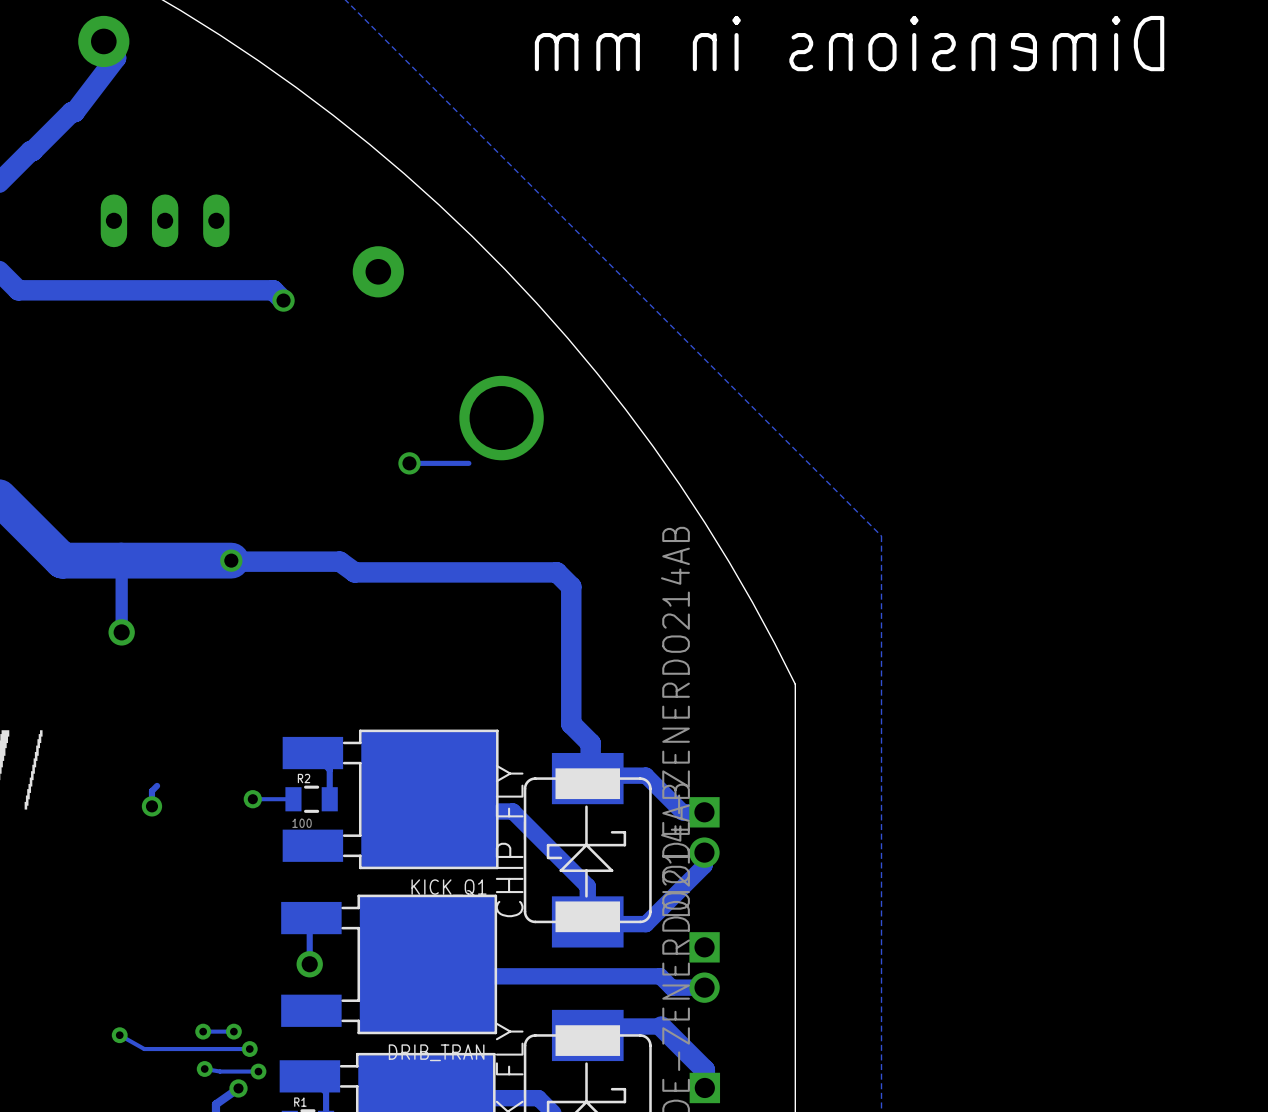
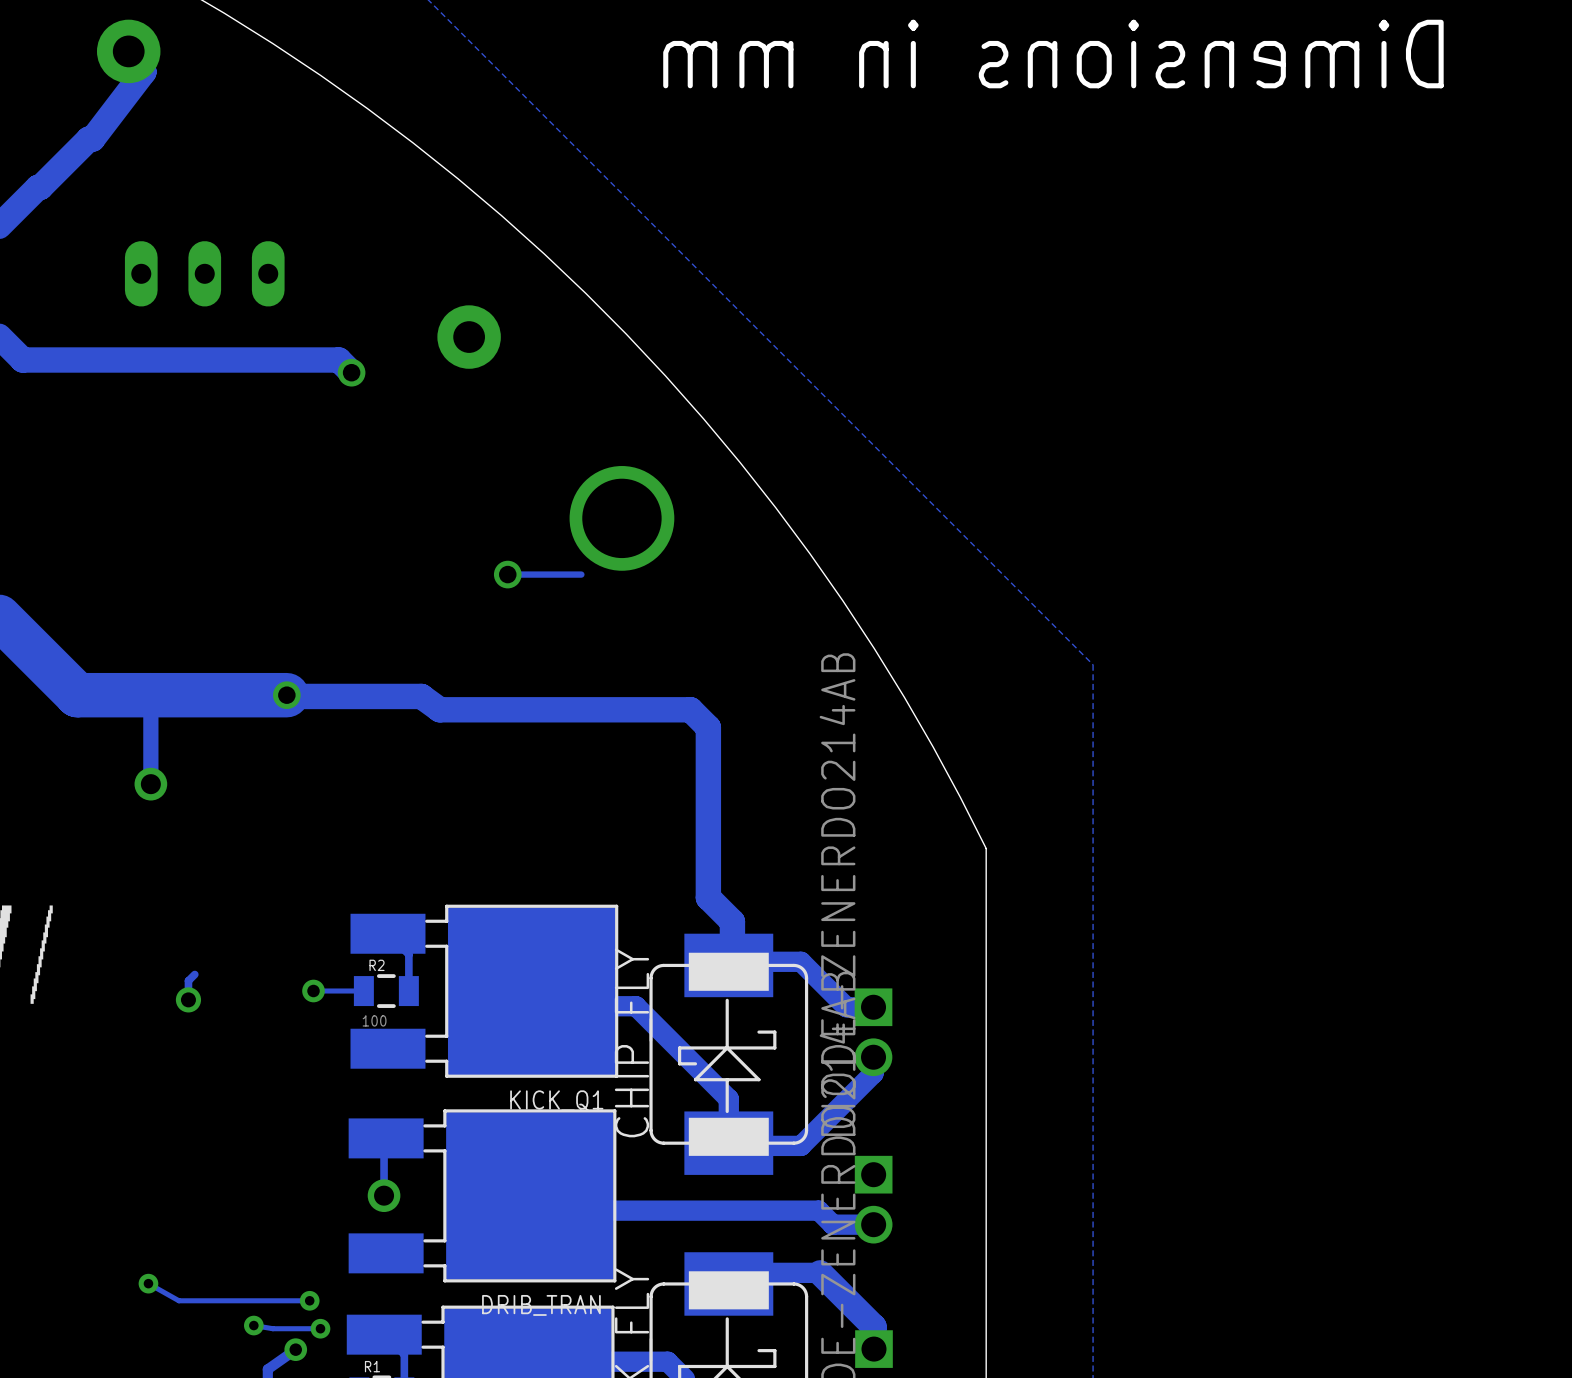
via: (203, 1031) -> none
track: (233, 1031) (203, 1031) -> none
via: (233, 1031) -> none

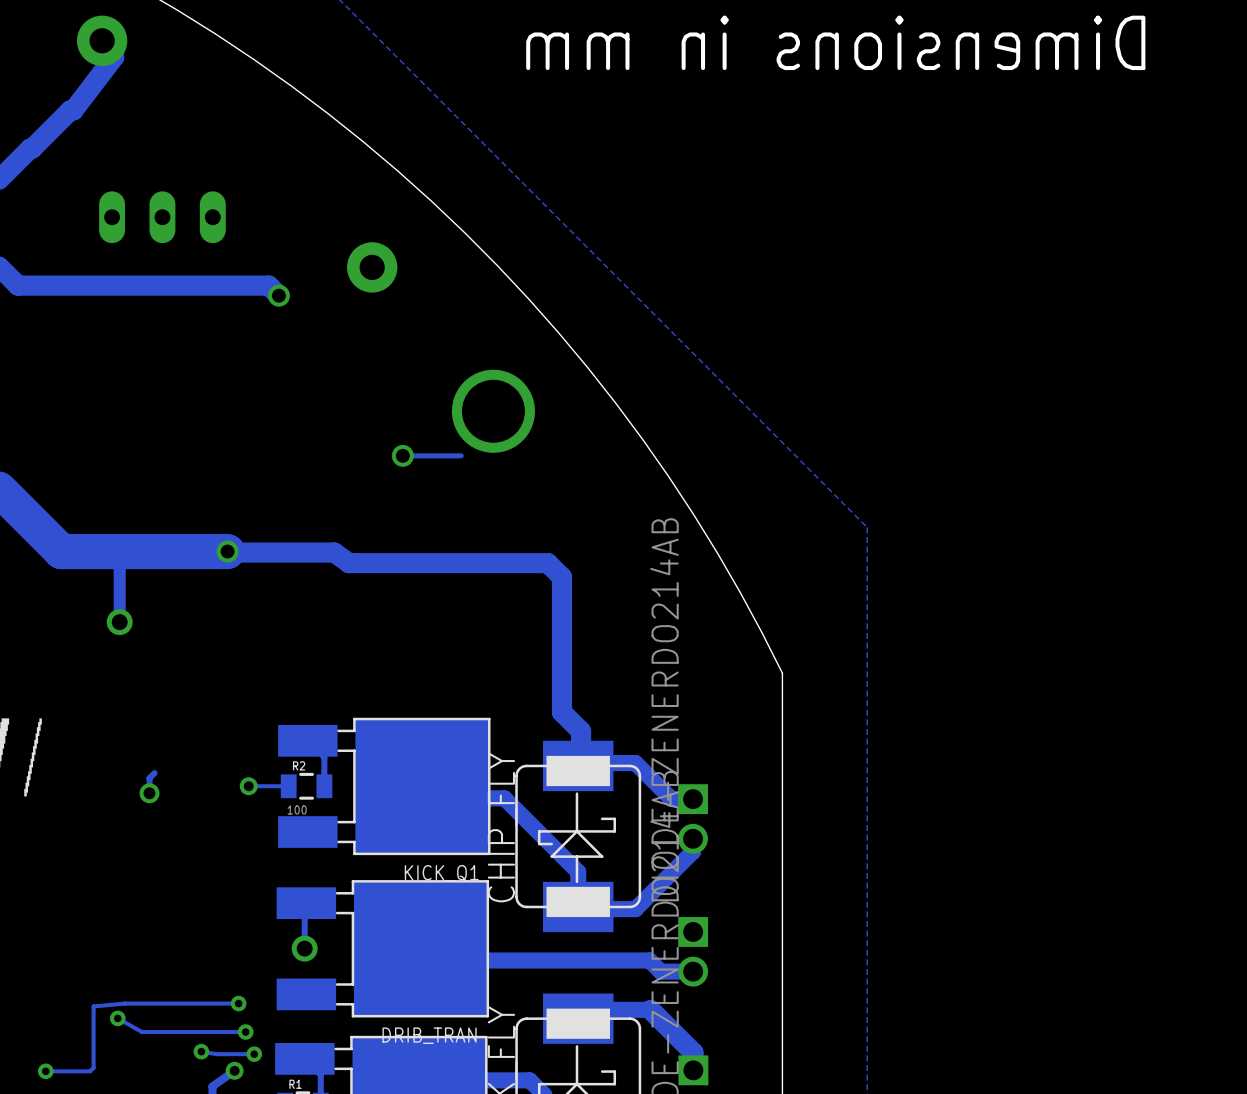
track: none -> (238, 1003) (124, 1003) (93, 1006) (93, 1067) (90, 1071) (45, 1071)
via: none -> (238, 1003)
via: none -> (45, 1071)

